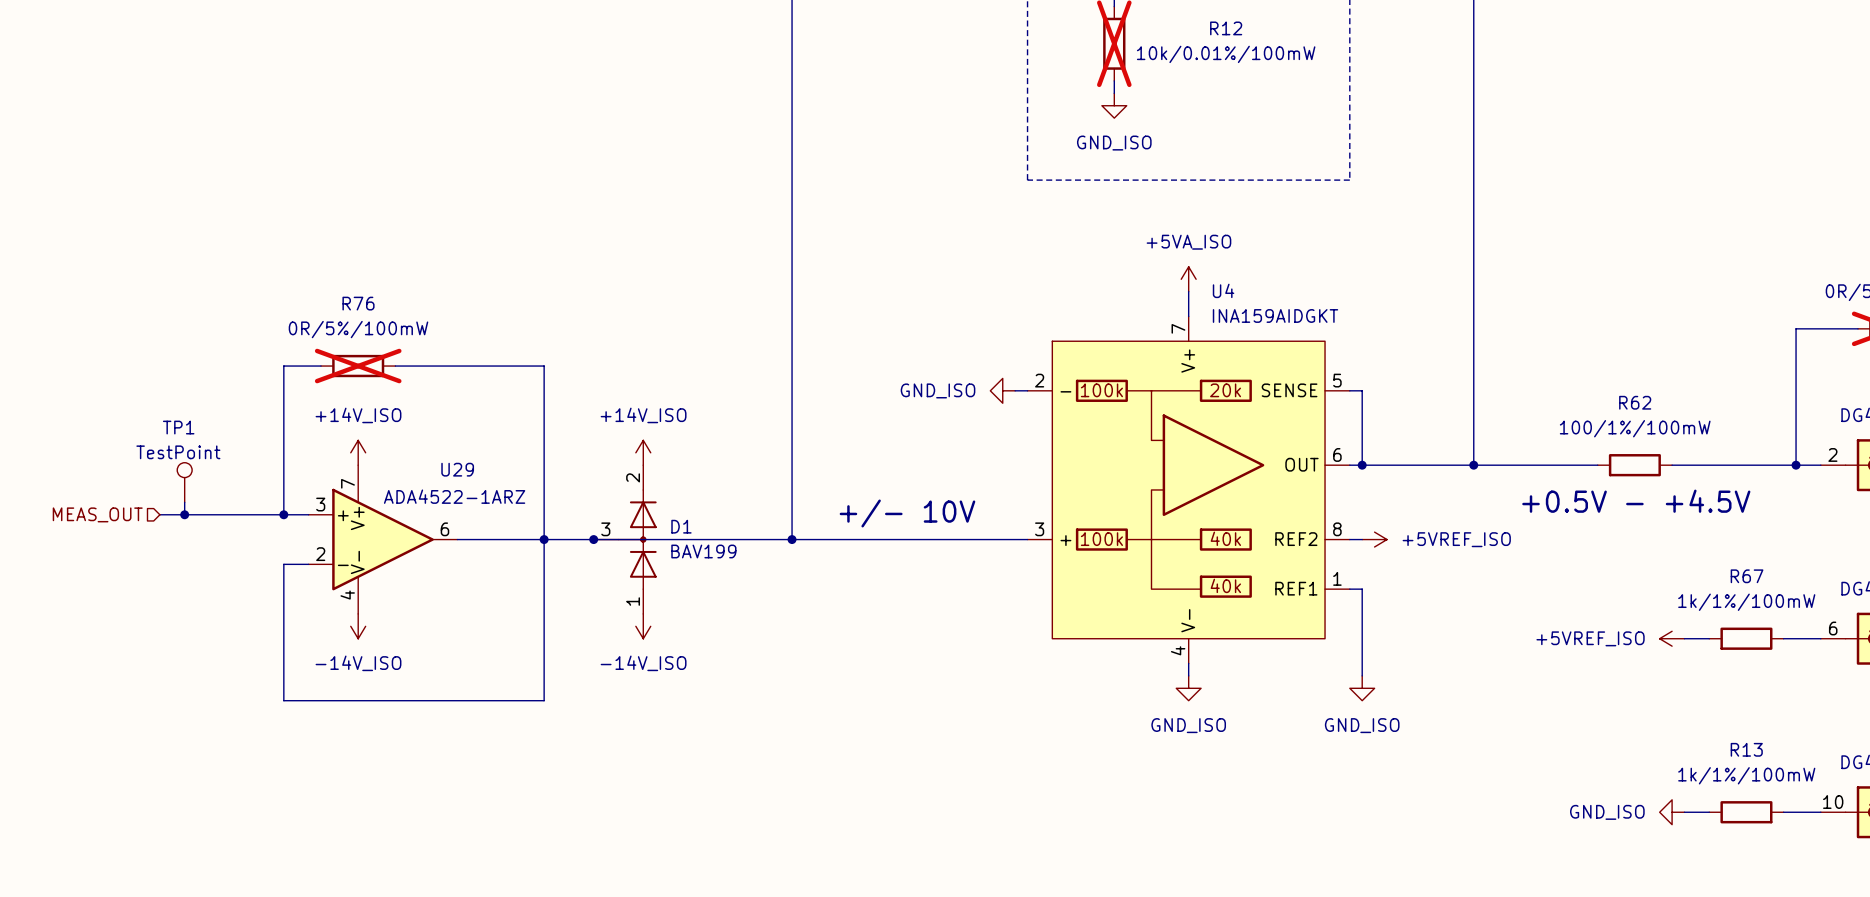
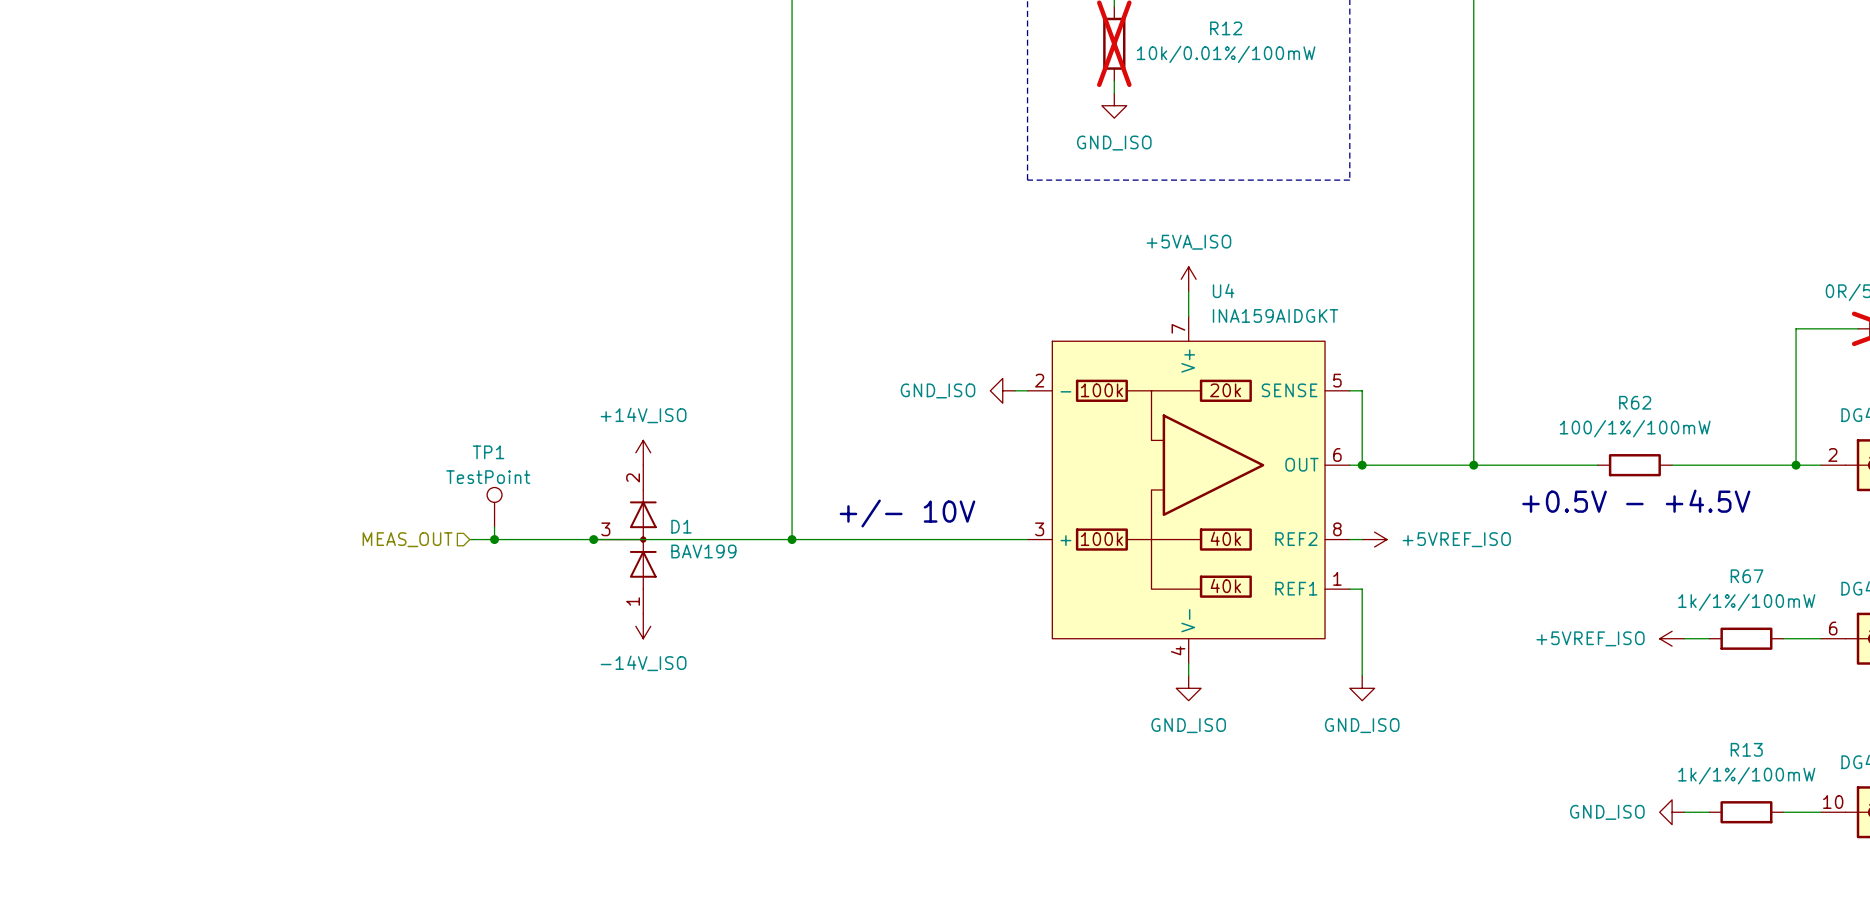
wire: (321, 366) (283, 366) (283, 514) -> none
R76: 0R/5%/100mW (358, 366) -> none
wire: (395, 366) (544, 366) (544, 700) (283, 700) (283, 564) (308, 564) -> none
power symbol: +14V_ISO (358, 452) -> none
TP1 position: (184, 482) -> (494, 507)
wire: (184, 502) (184, 514) -> none
hierarchical label: MEAS_OUT (97, 514) -> none
wire: (159, 514) (308, 514) -> none
junction: (184, 514) -> none
junction: (283, 514) -> none
wire: none -> (494, 527) (494, 539)
U29: ADA4522-1ARZ (382, 539) -> none
hierarchical label: none -> MEAS_OUT (407, 539)
wire: (457, 539) (469, 539) -> none
junction position: (544, 539) -> (494, 539)
power symbol: -14V_ISO (358, 626) -> none

